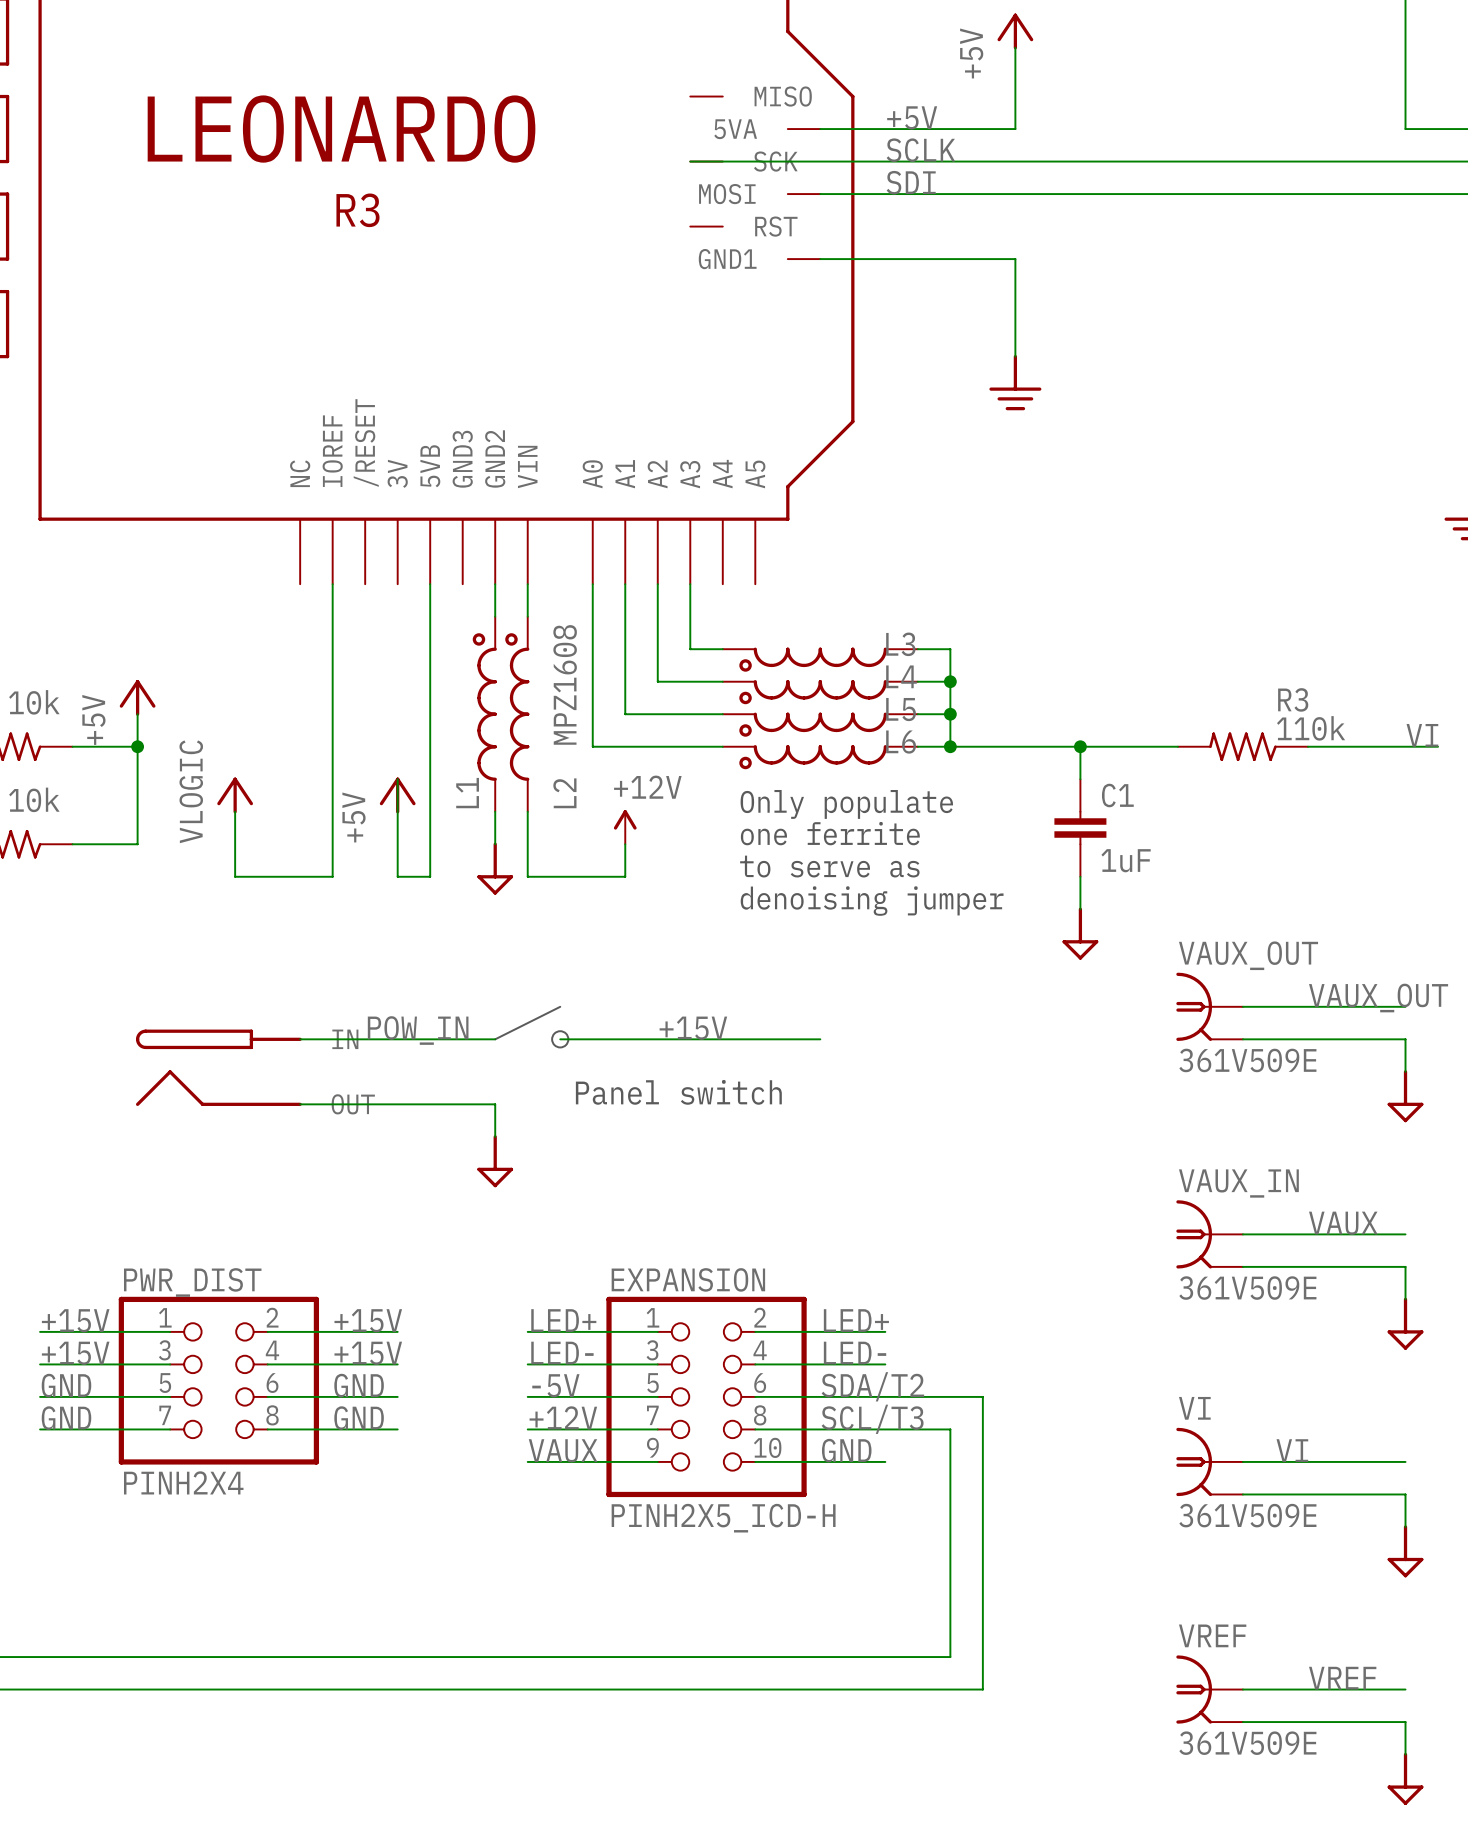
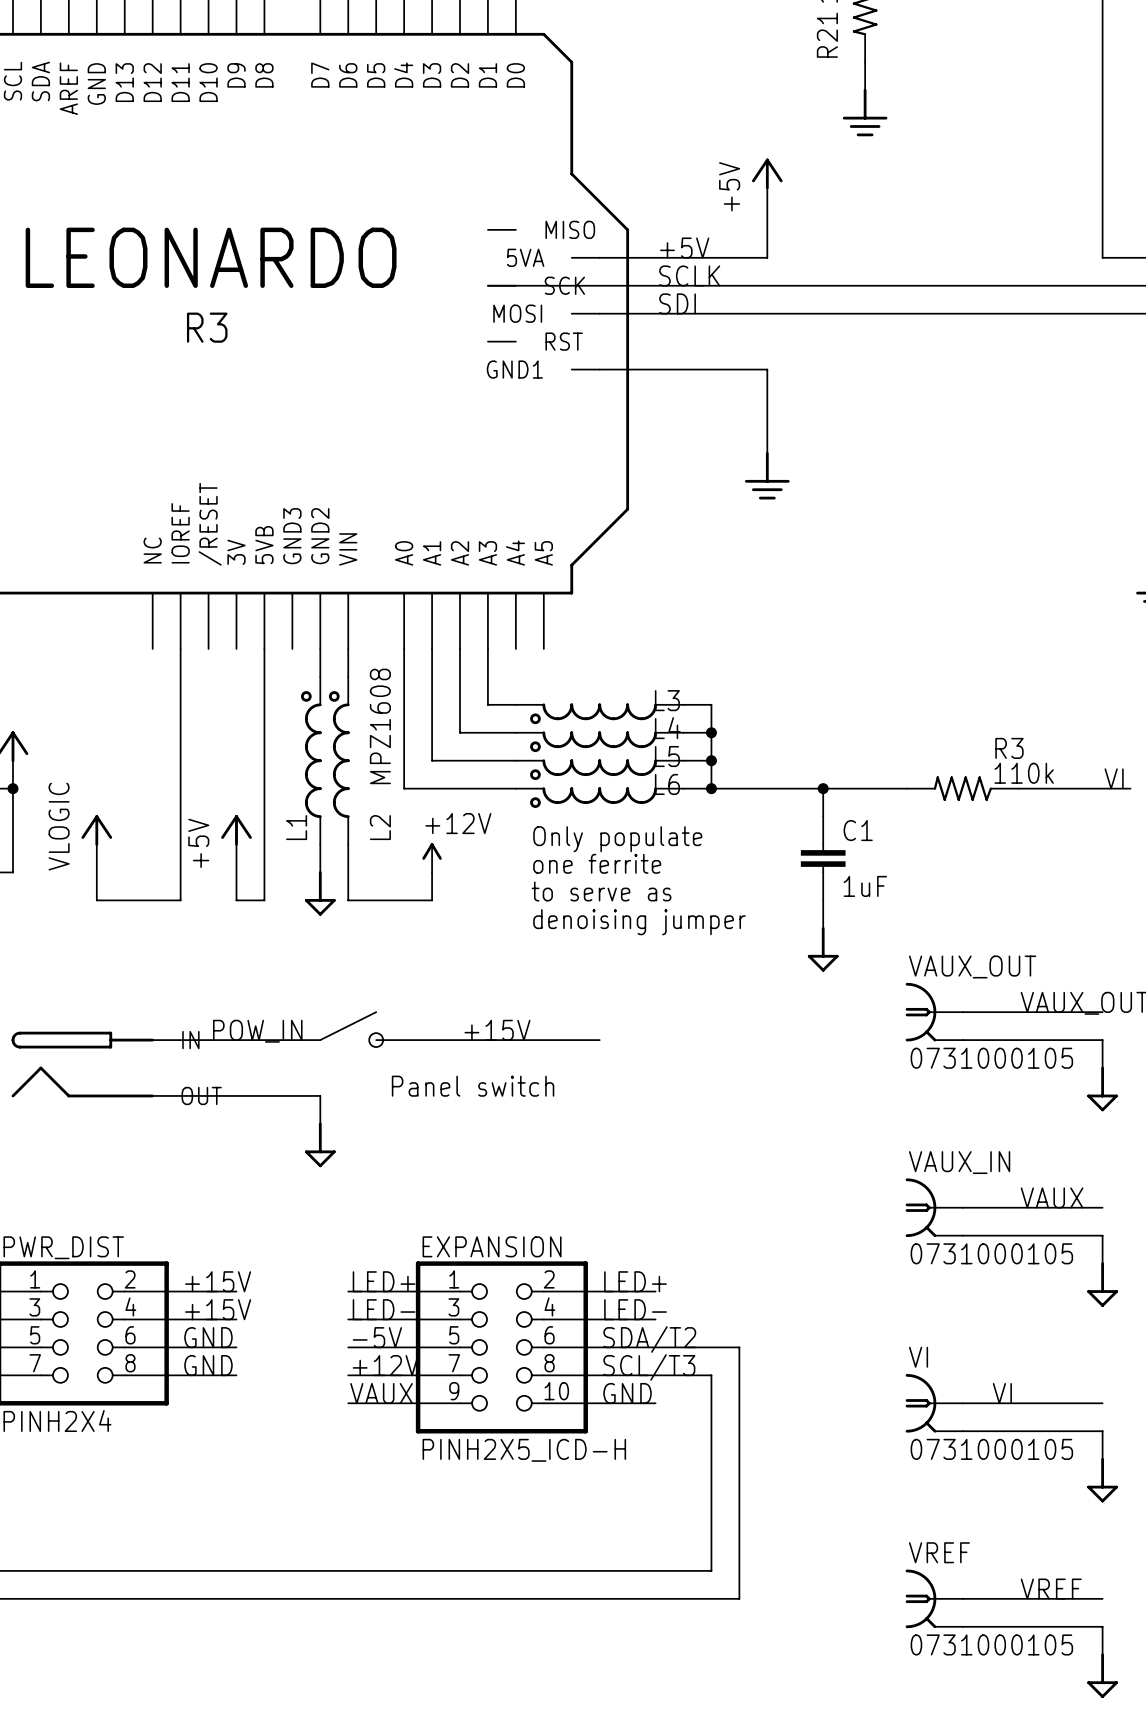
VAUX_OUT value: 361V509E (1247, 1060) -> 0731000105 (991, 1058)
VAUX_IN value: 361V509E (1247, 1288) -> 0731000105 (991, 1253)
VI value: 361V509E (1247, 1515) -> 0731000105 (991, 1449)
VREF value: 361V509E (1247, 1743) -> 0731000105 (991, 1644)

